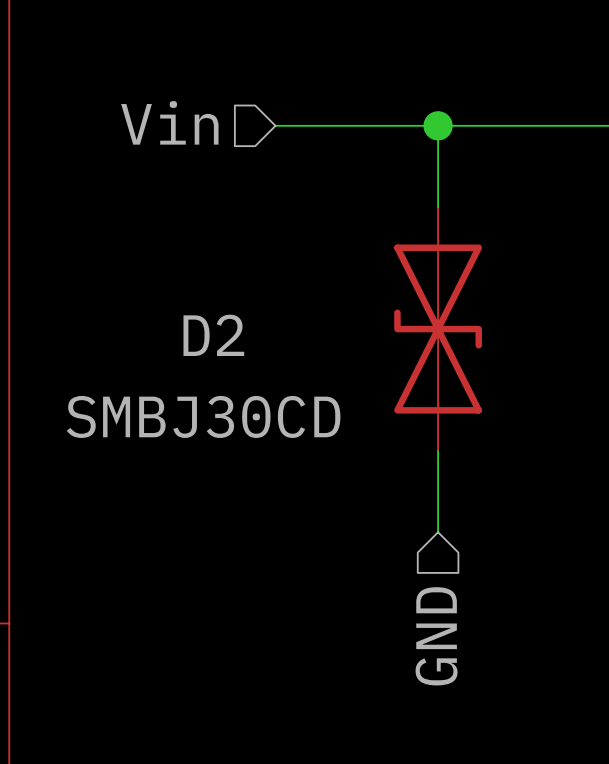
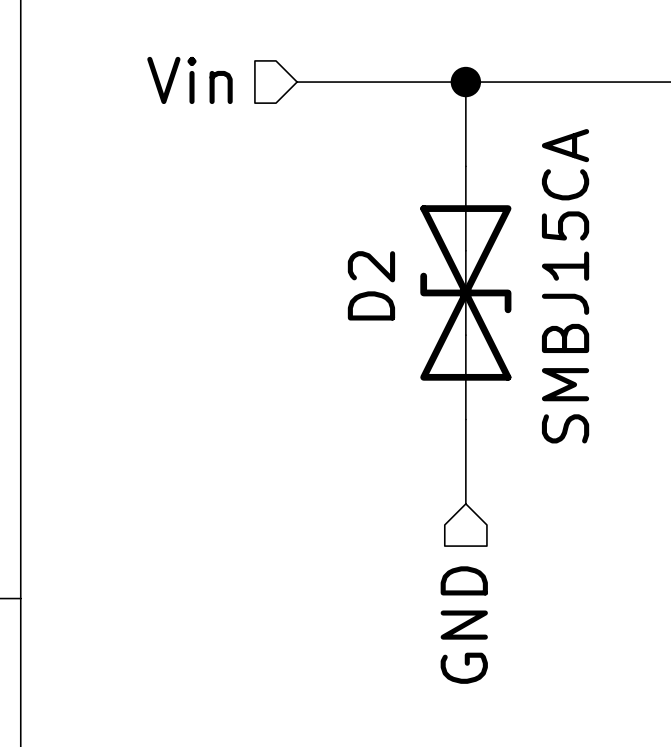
D2 name rotation: 0° (213, 335) -> 90° counterclockwise (371, 285)
D2 name position: D2 (213, 335) -> D2 (371, 285)
D2 value: SMBJ30CD (203, 416) -> SMBJ15CA (565, 286)

